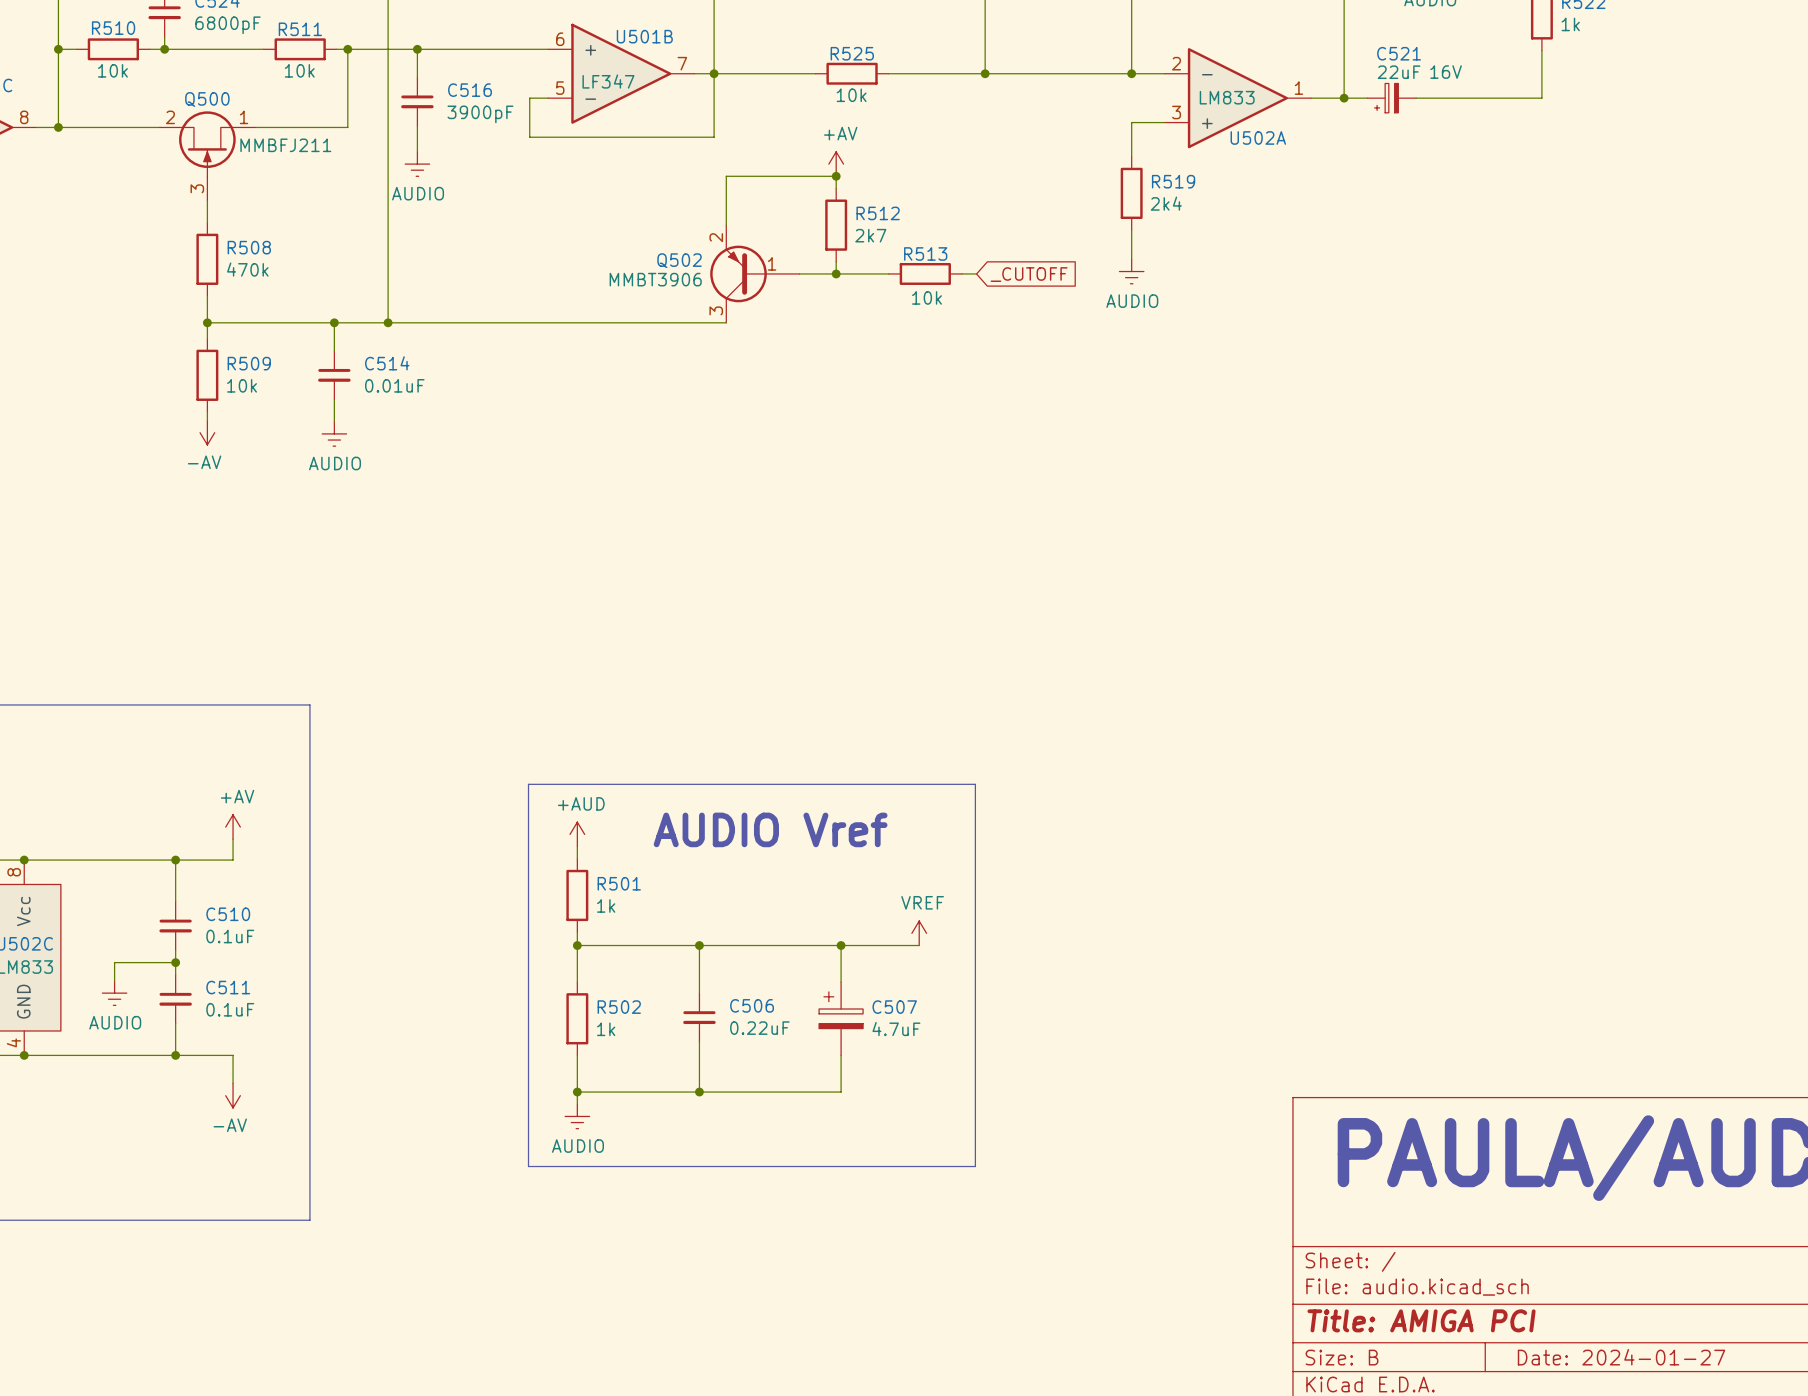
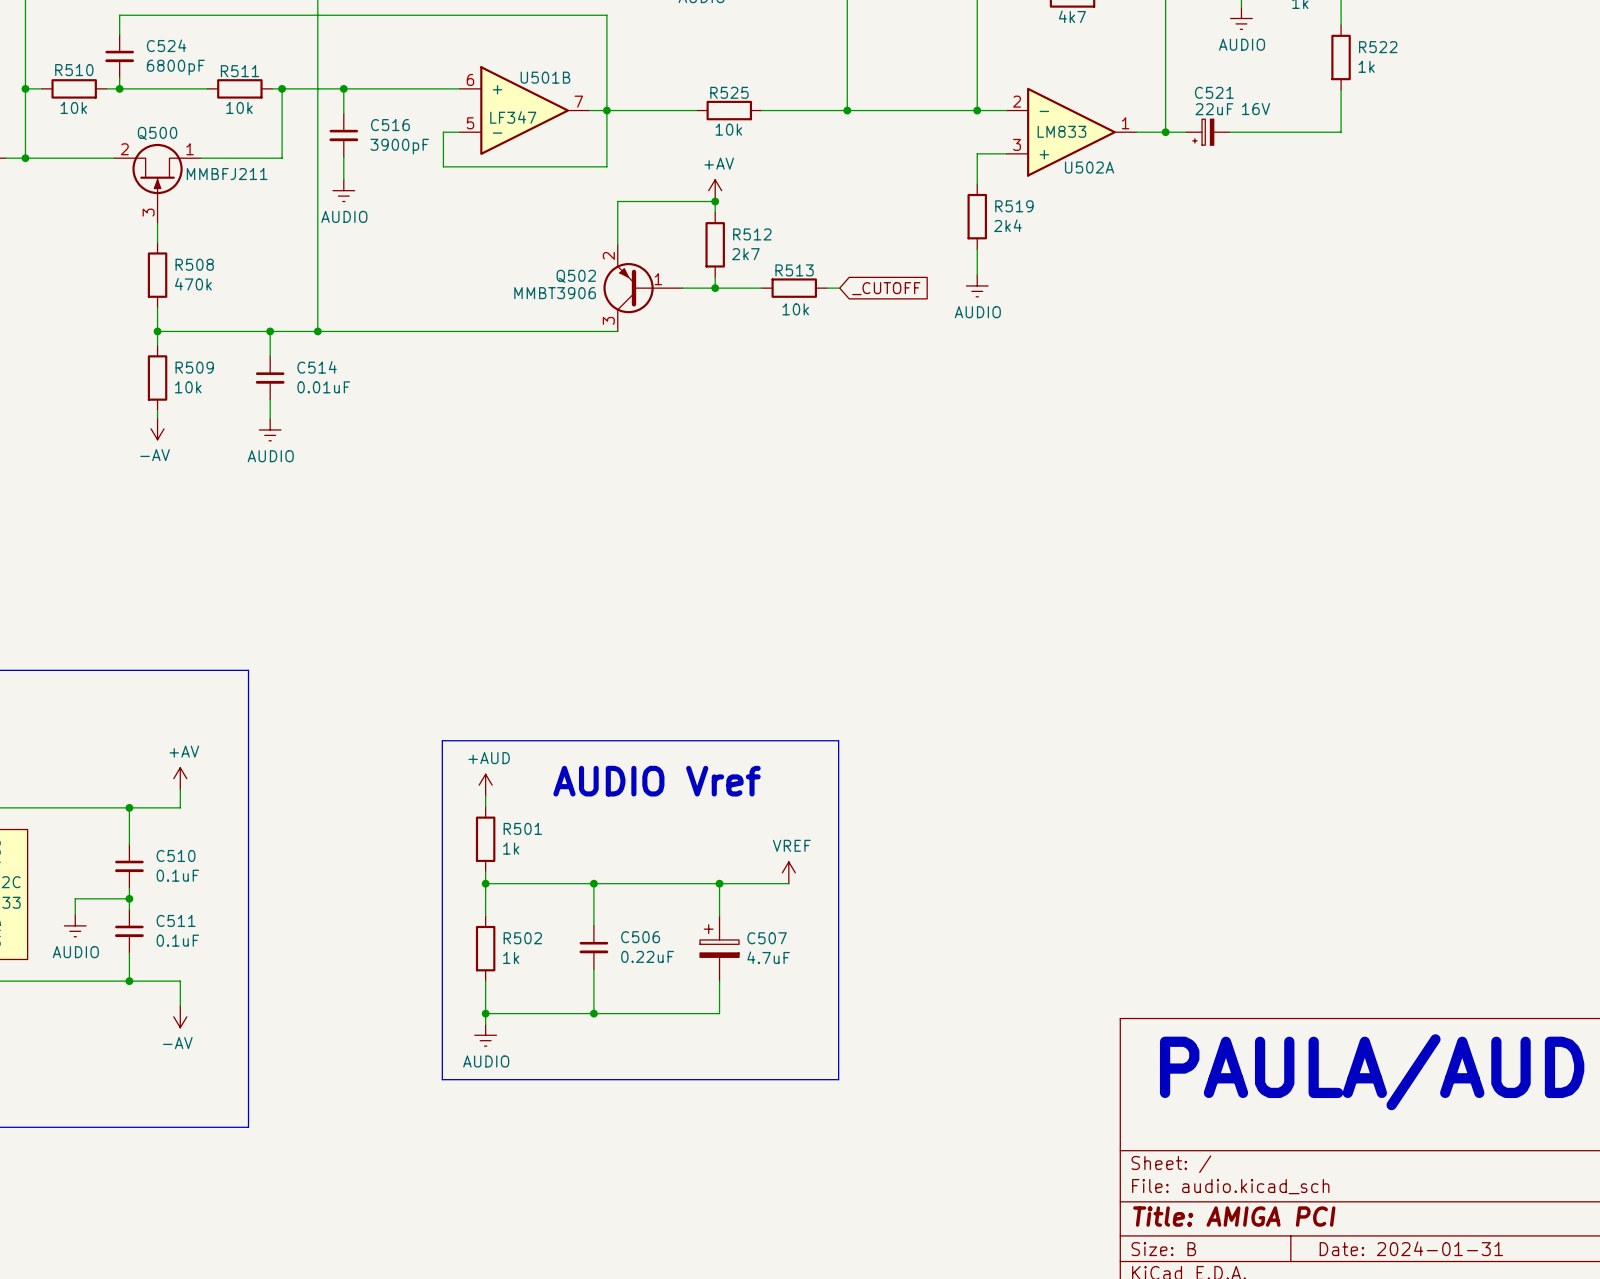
title block: Date: 2024-01-27 (1621, 1357) -> Date: 2024-01-31 (1411, 1248)

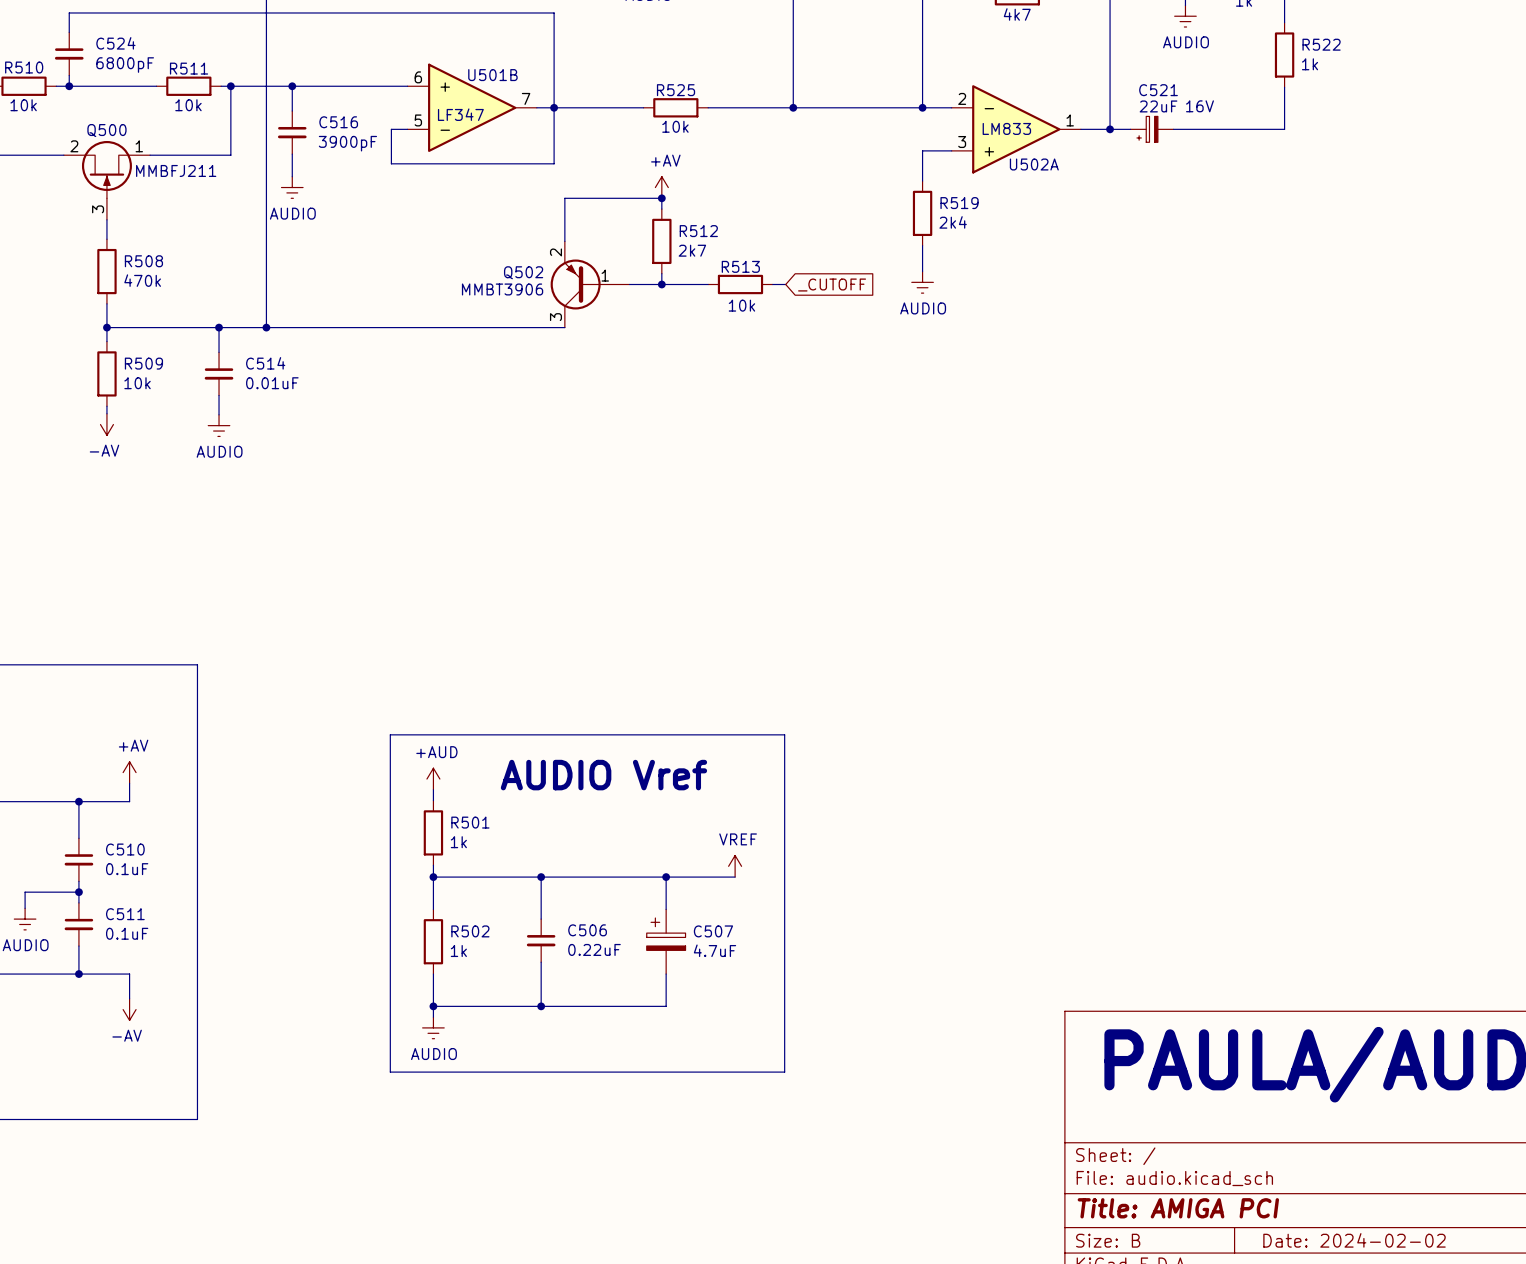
title block: Date: 2024-01-31 (1411, 1248) -> Date: 2024-02-02 (1354, 1240)

